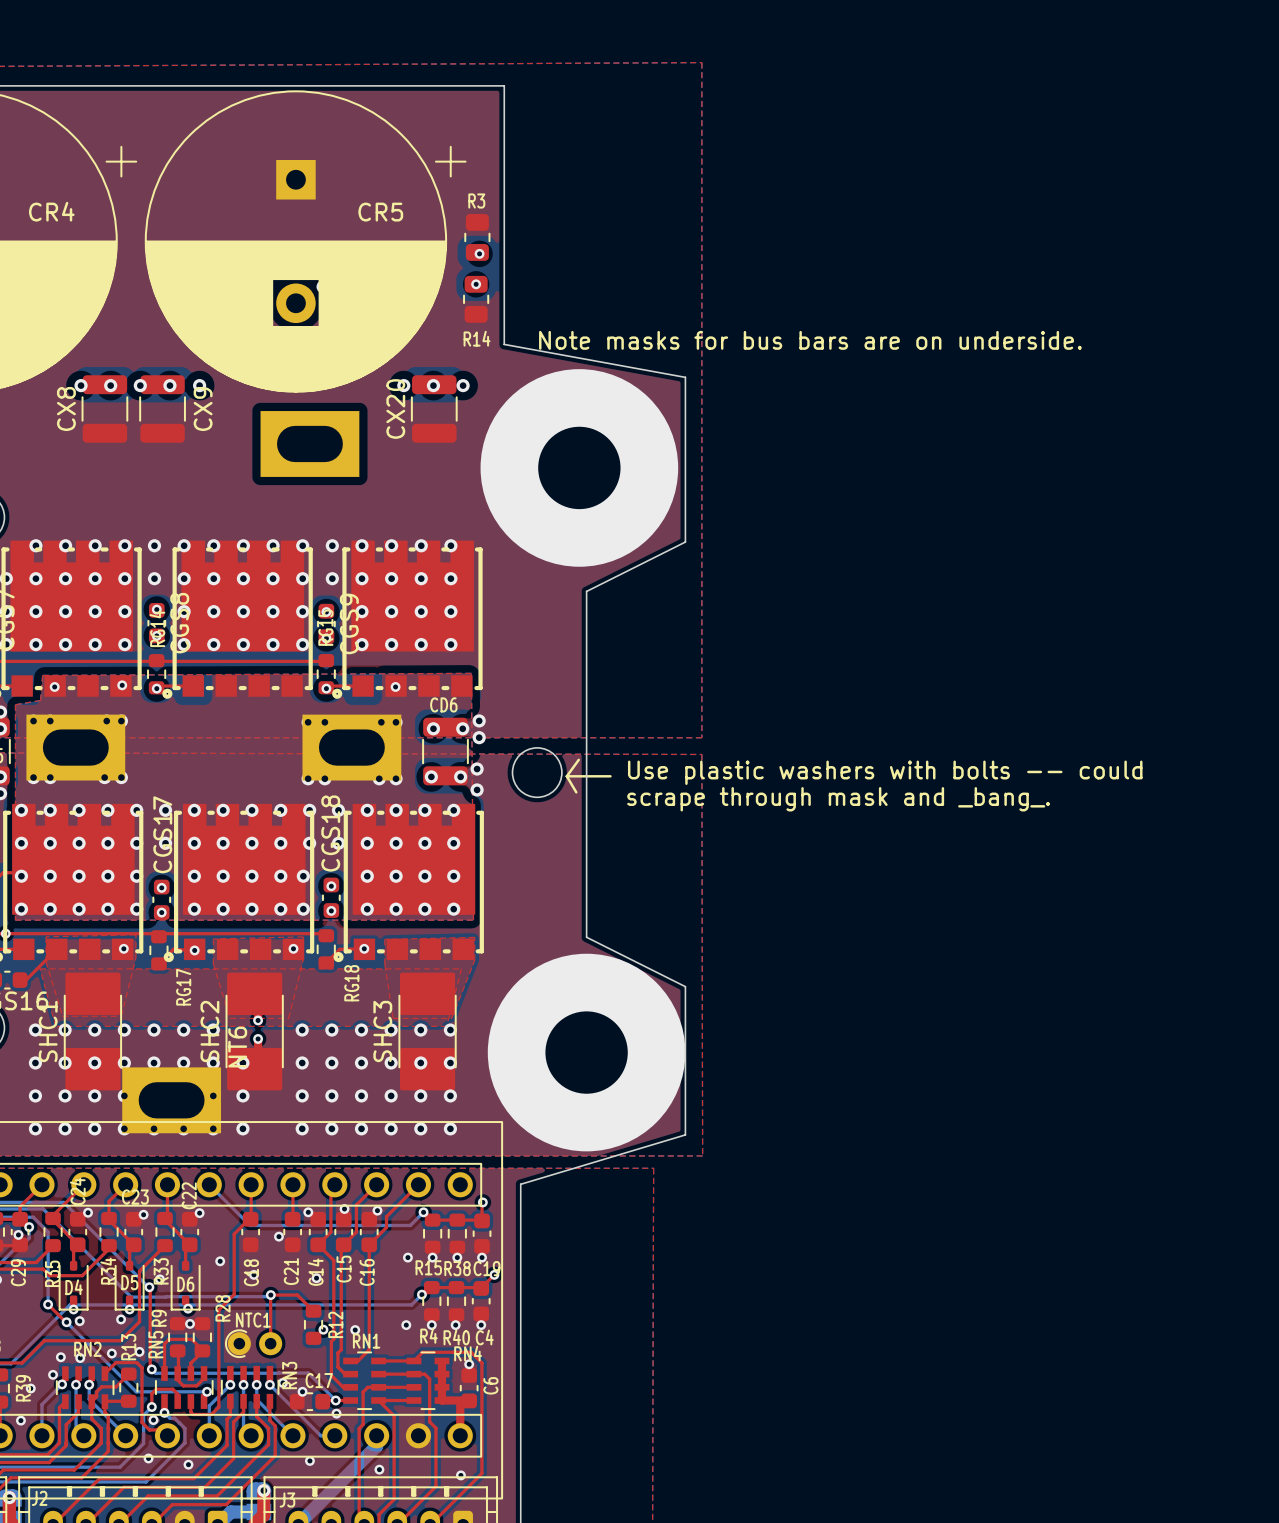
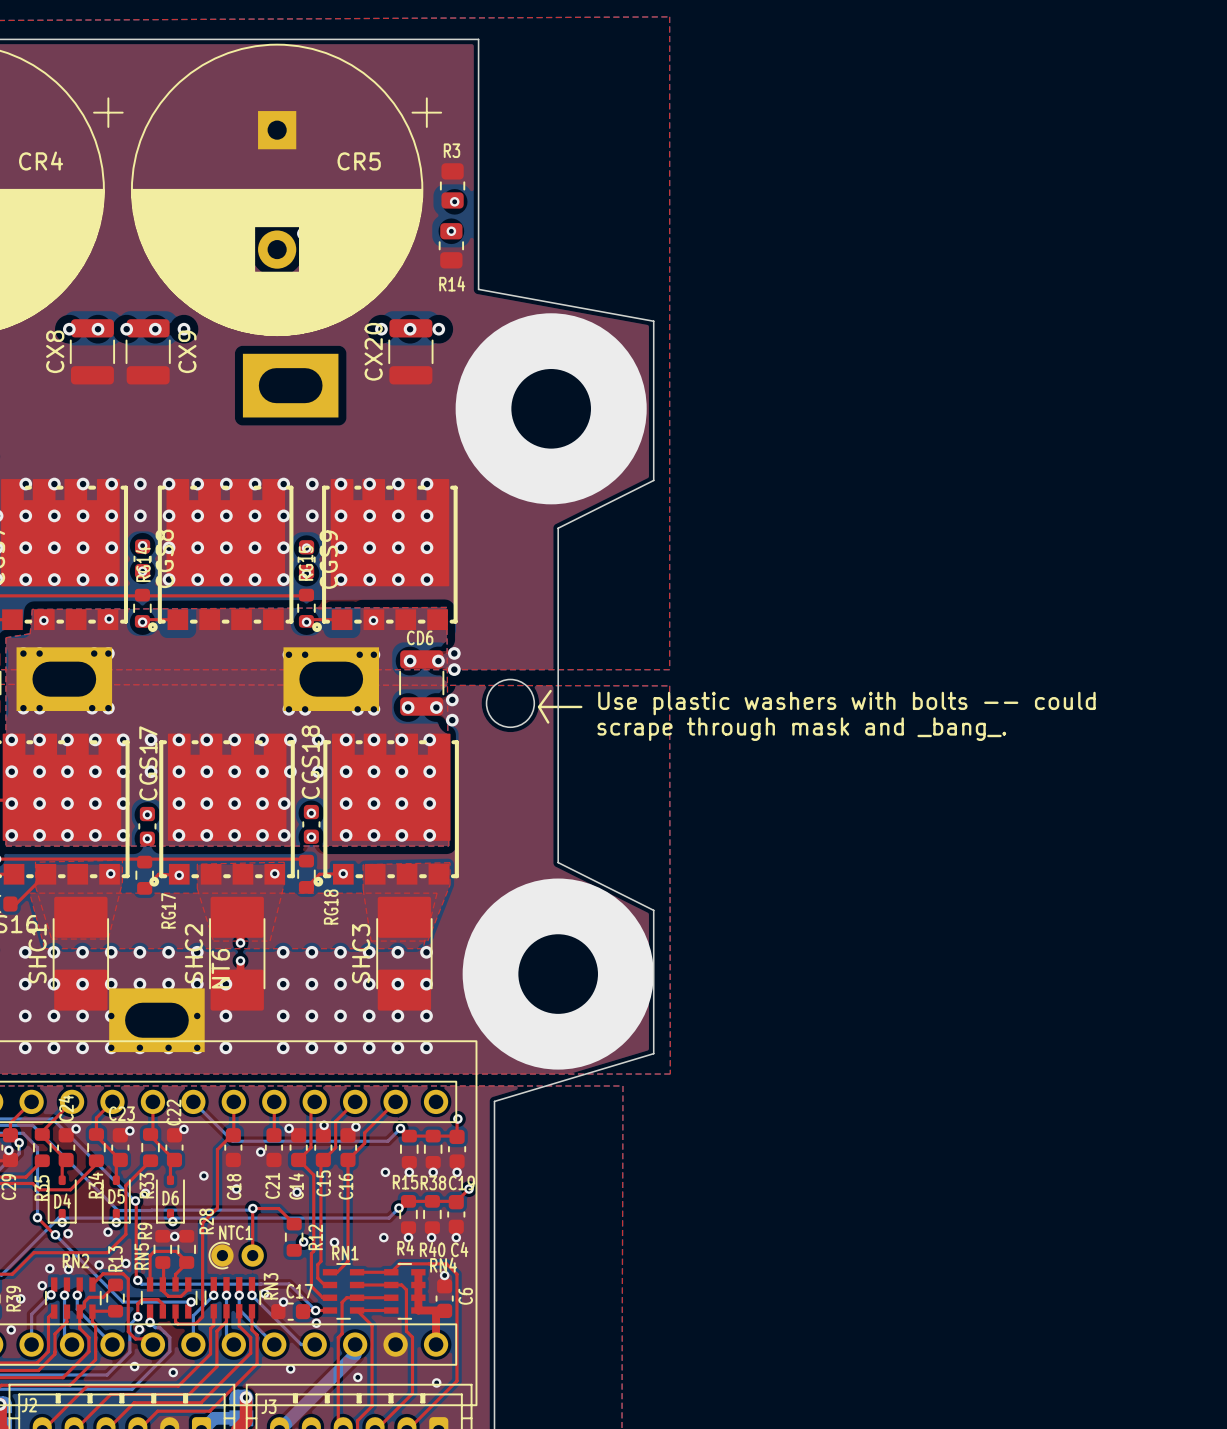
text: Note masks for bus bars are on underside. (810, 340) -> none

